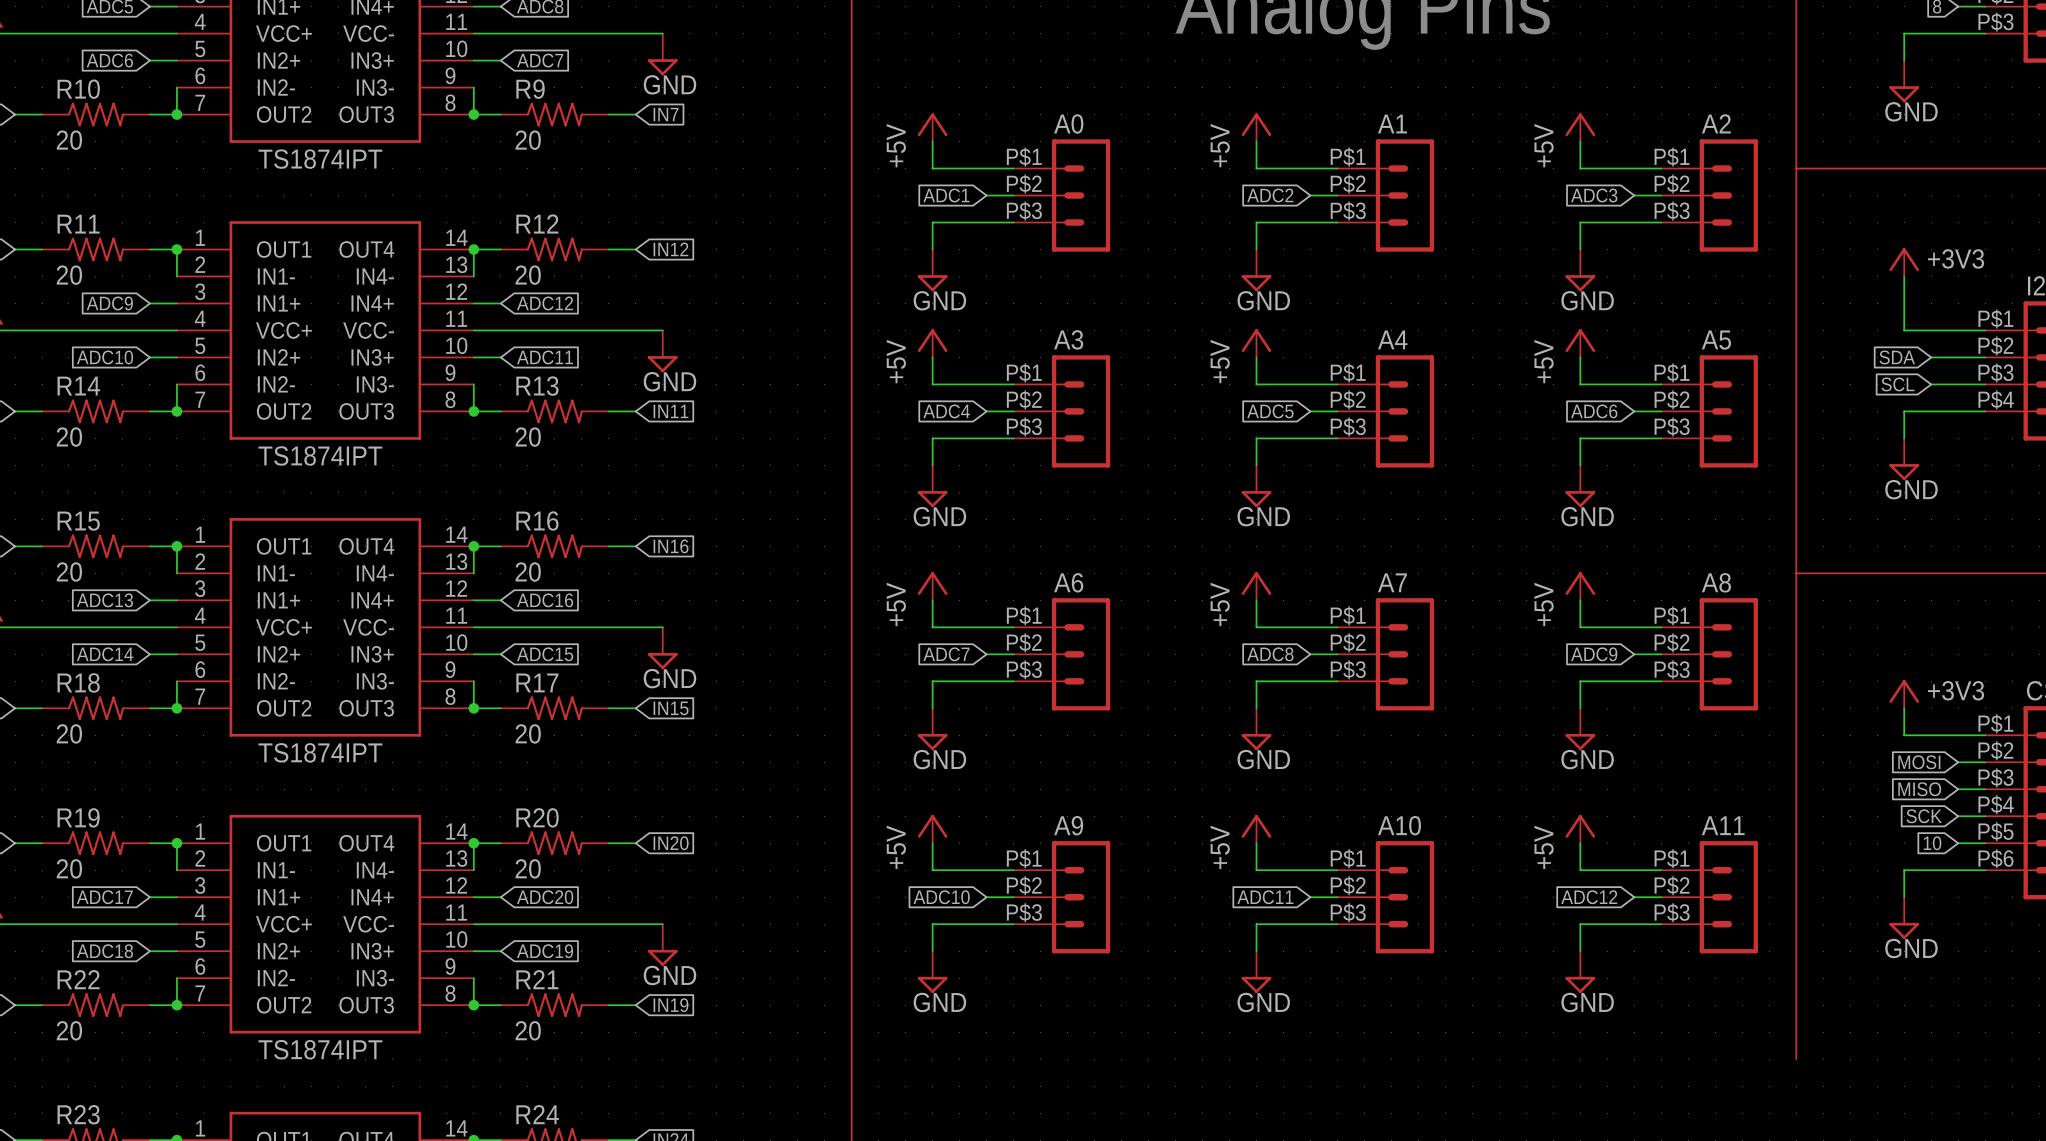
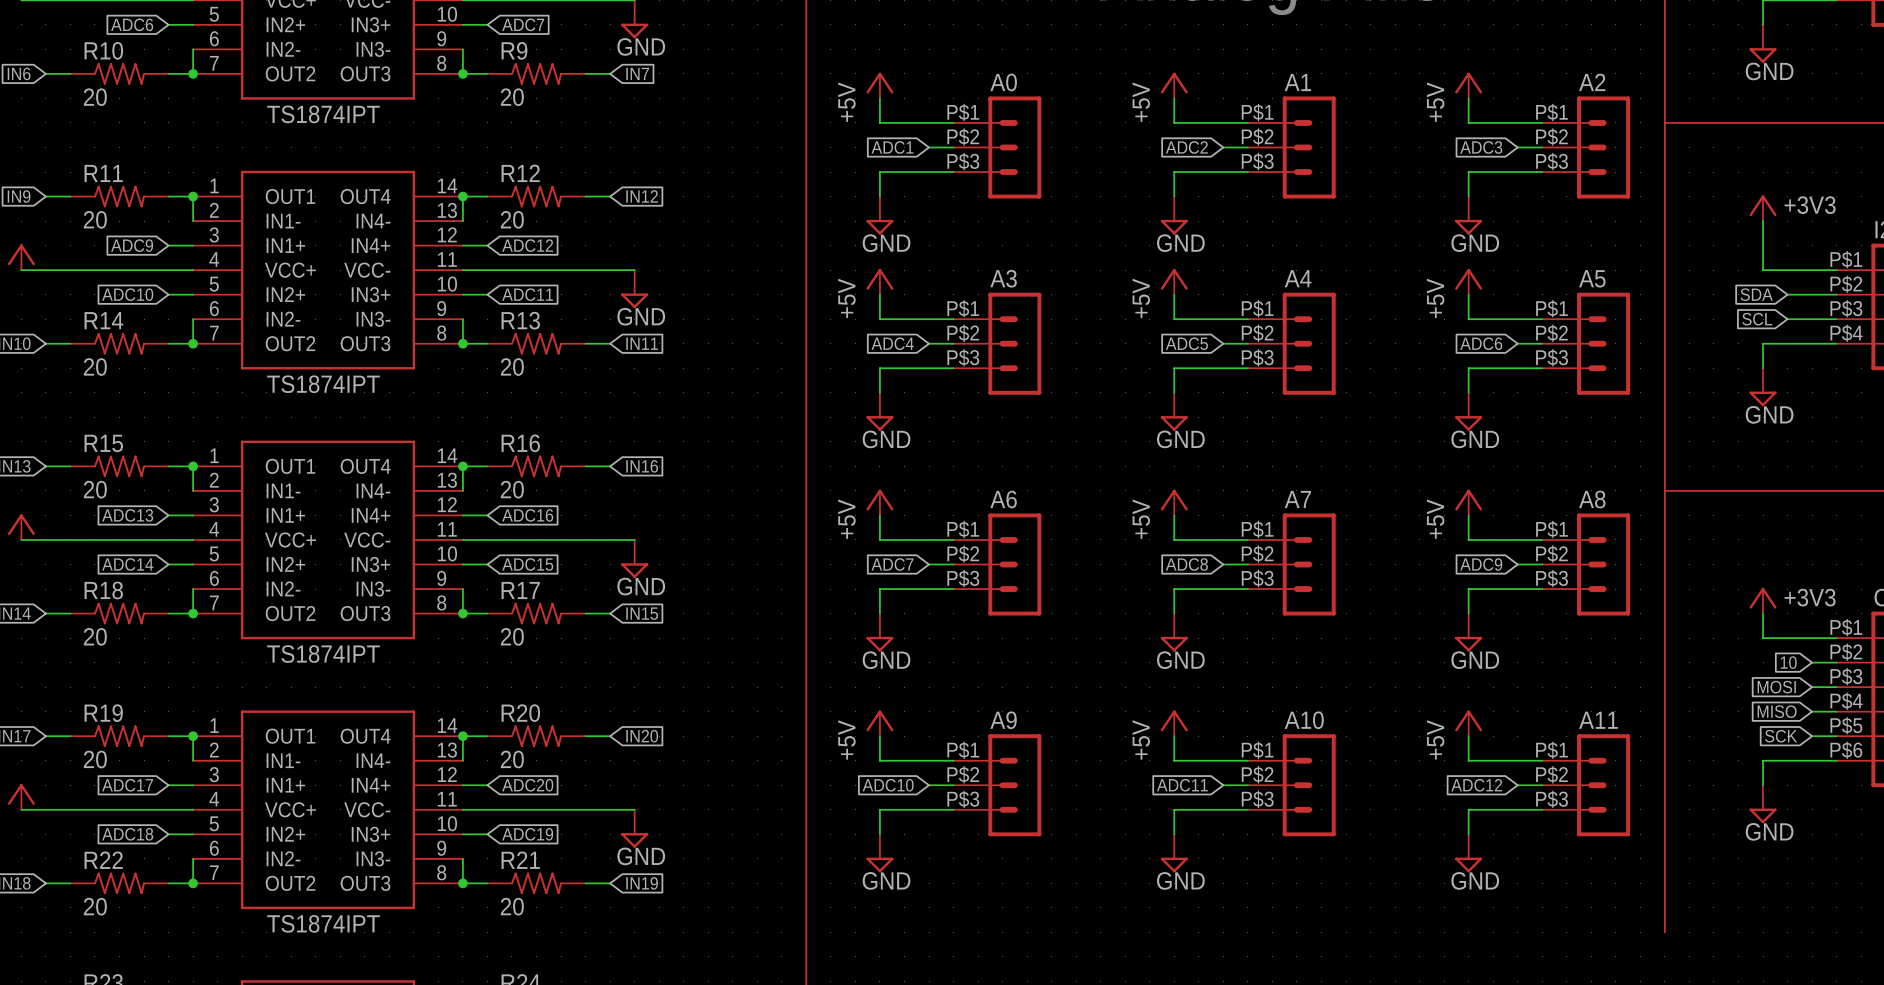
global label: MOSI (1919, 762) -> 10 (1788, 662)
global label: MISO (1919, 789) -> MOSI (1776, 687)
global label: SCK (1924, 816) -> MISO (1777, 711)
global label: 10 (1932, 843) -> SCK (1781, 736)

